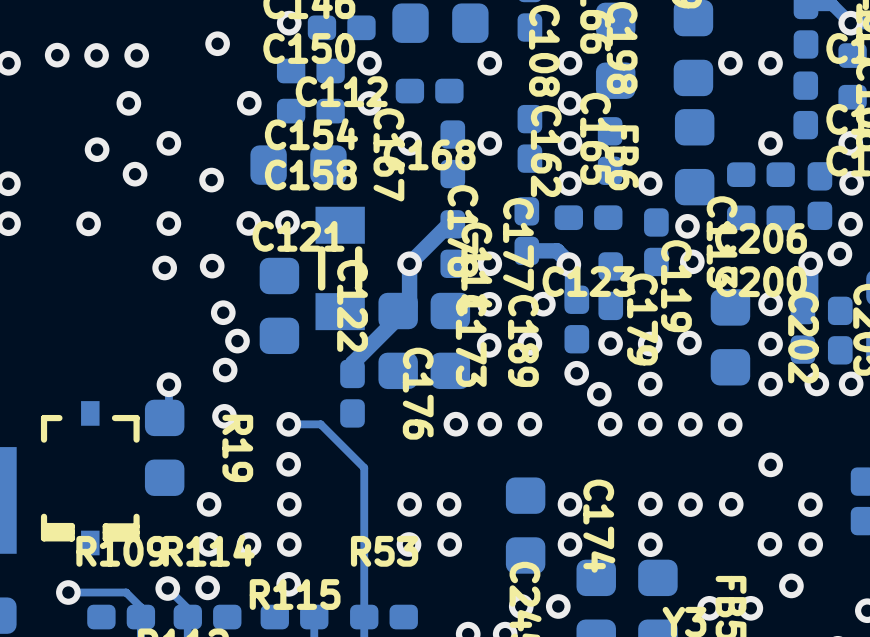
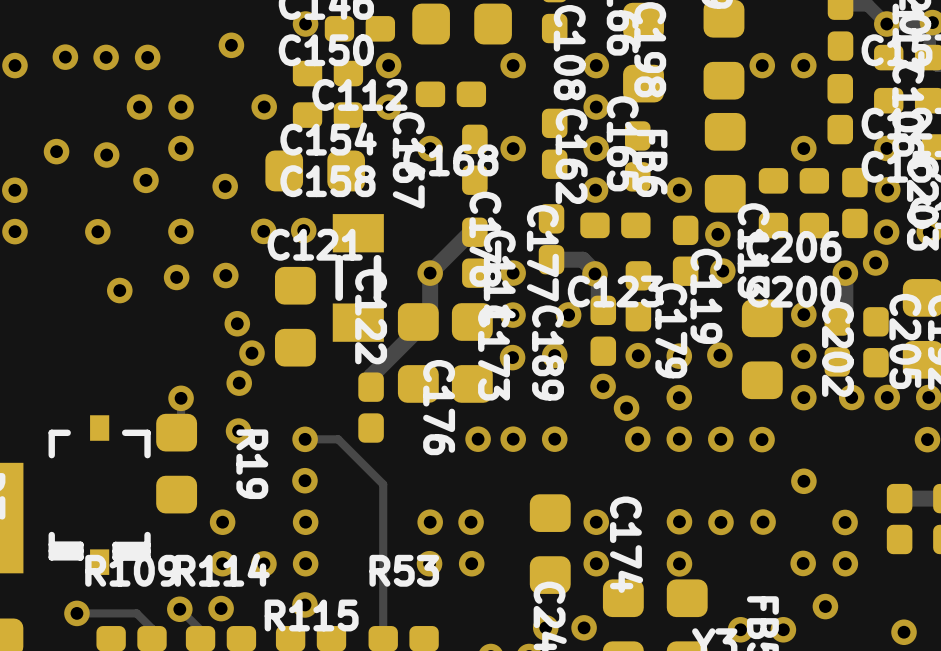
via: none -> (181, 107)
via: none -> (56, 151)
via: none -> (119, 290)

